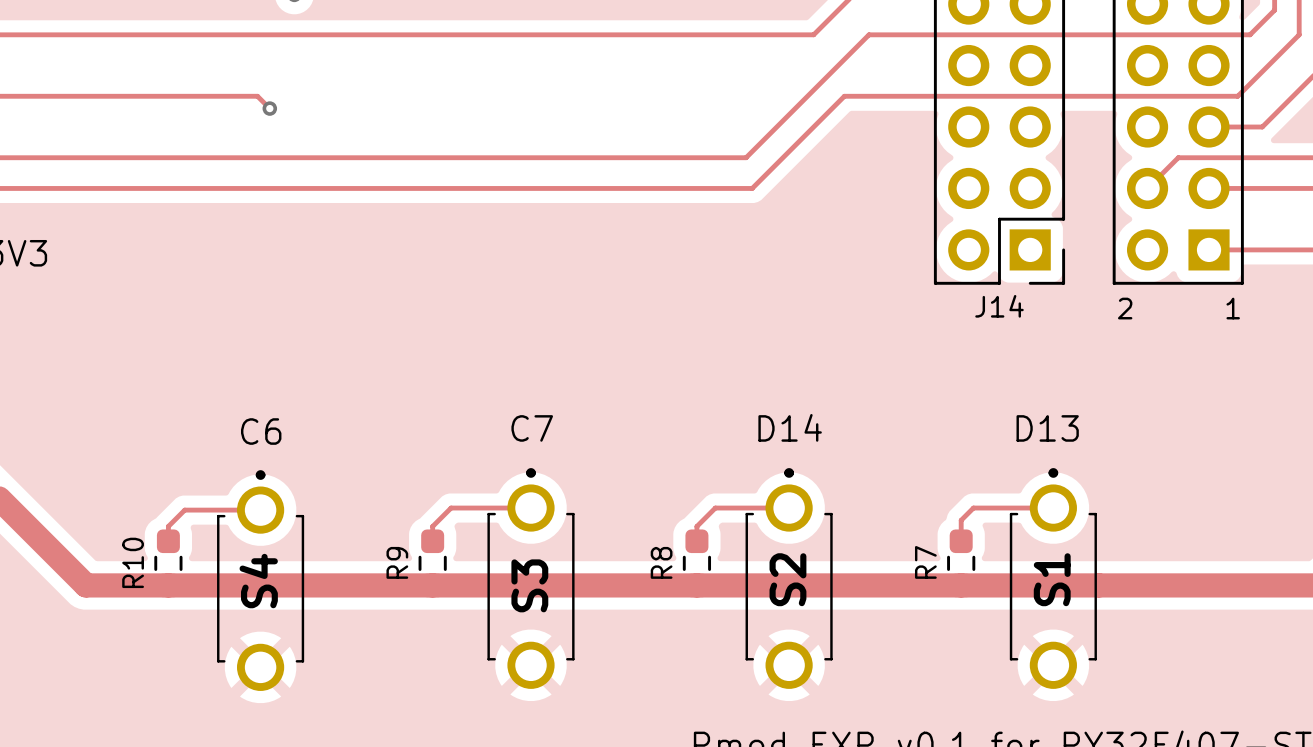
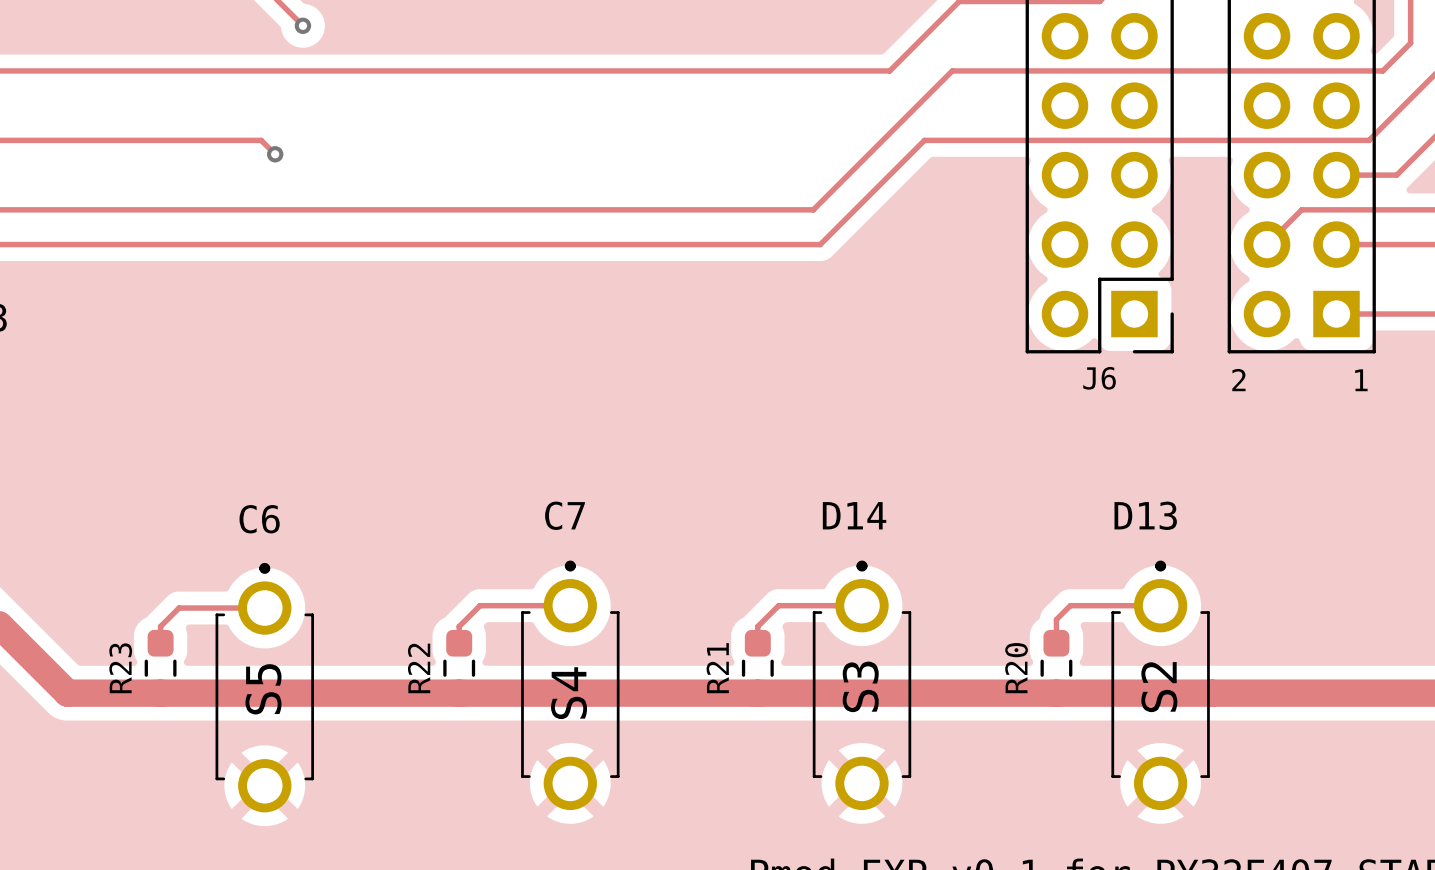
J14 name: J14 (999, 306) -> J6 (1099, 378)
R10 name: R10 (133, 562) -> R23 (120, 668)
R9 name: R9 (397, 562) -> R22 (419, 668)
R8 name: R8 (661, 562) -> R21 (717, 668)
R7 name: R7 (925, 562) -> R20 (1016, 668)
S2 name: S2 (787, 579) -> S3 (860, 686)
S1 name: S1 (1052, 579) -> S2 (1159, 687)
S4 name: S4 (258, 581) -> S5 (263, 689)
S3 name: S3 (529, 585) -> S4 (569, 693)

